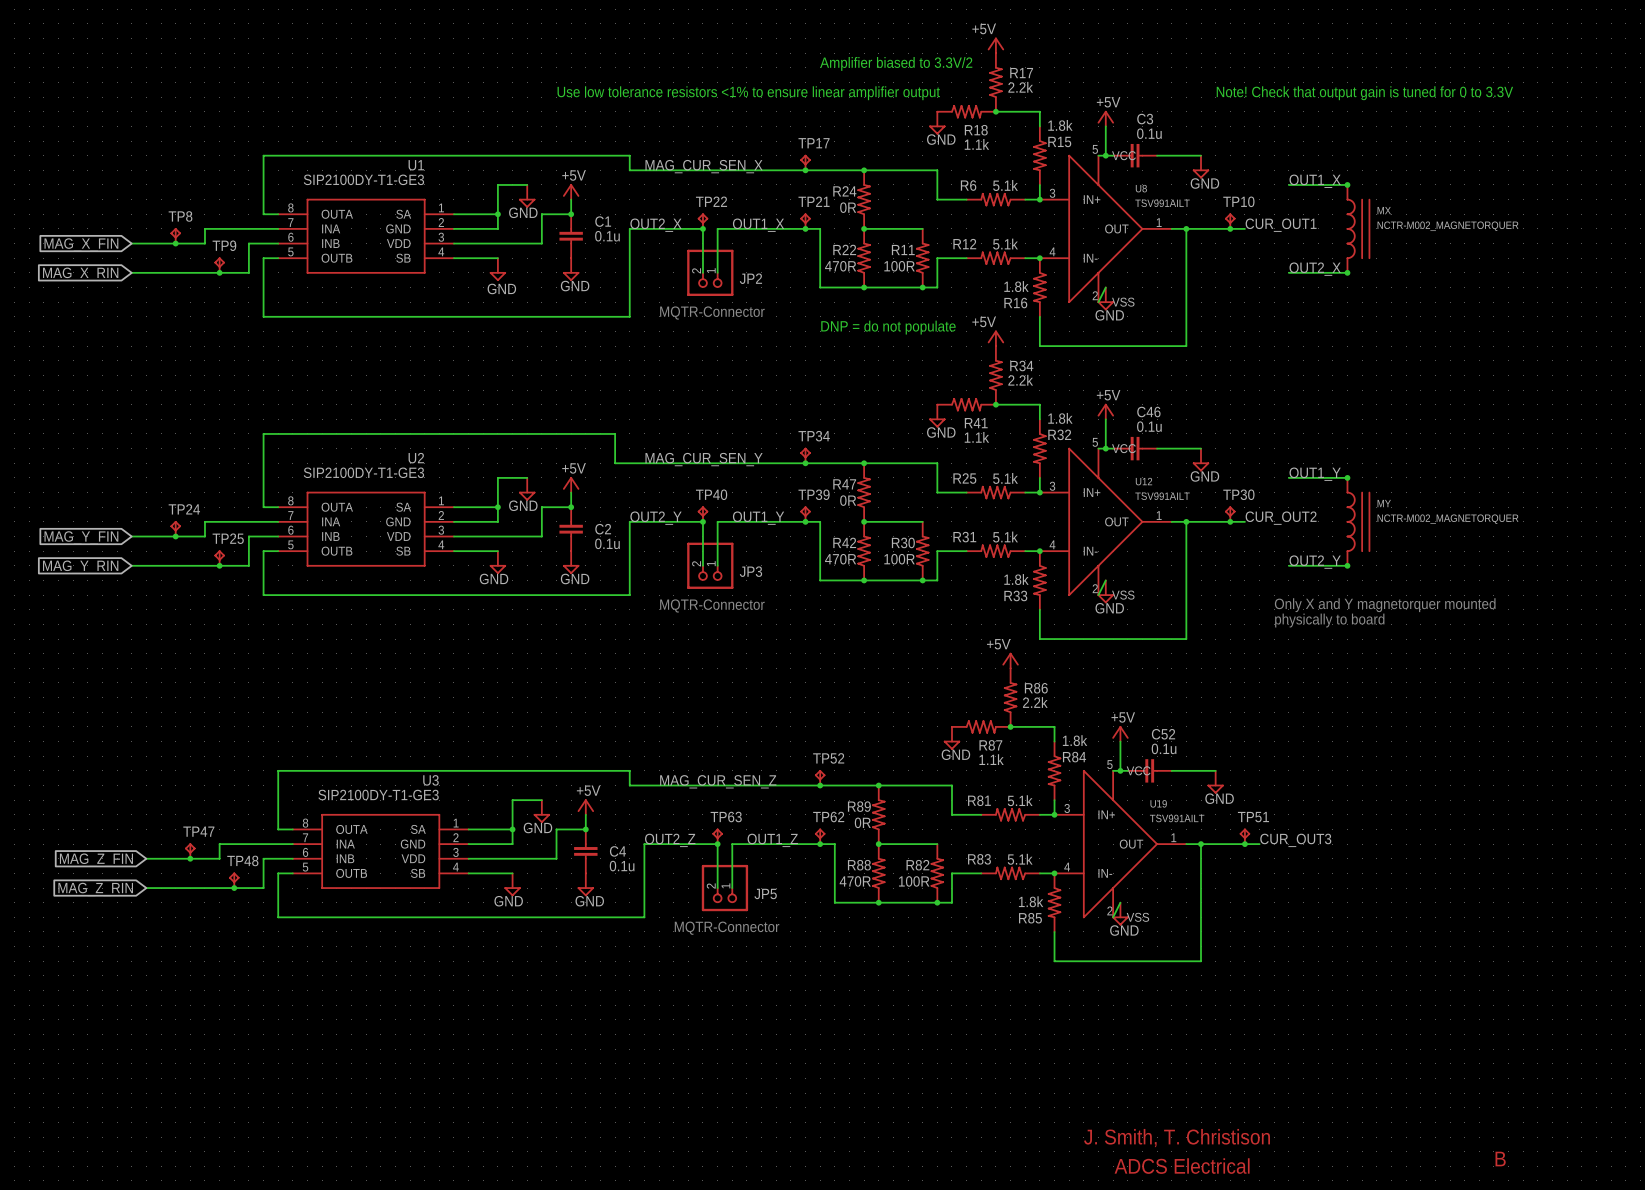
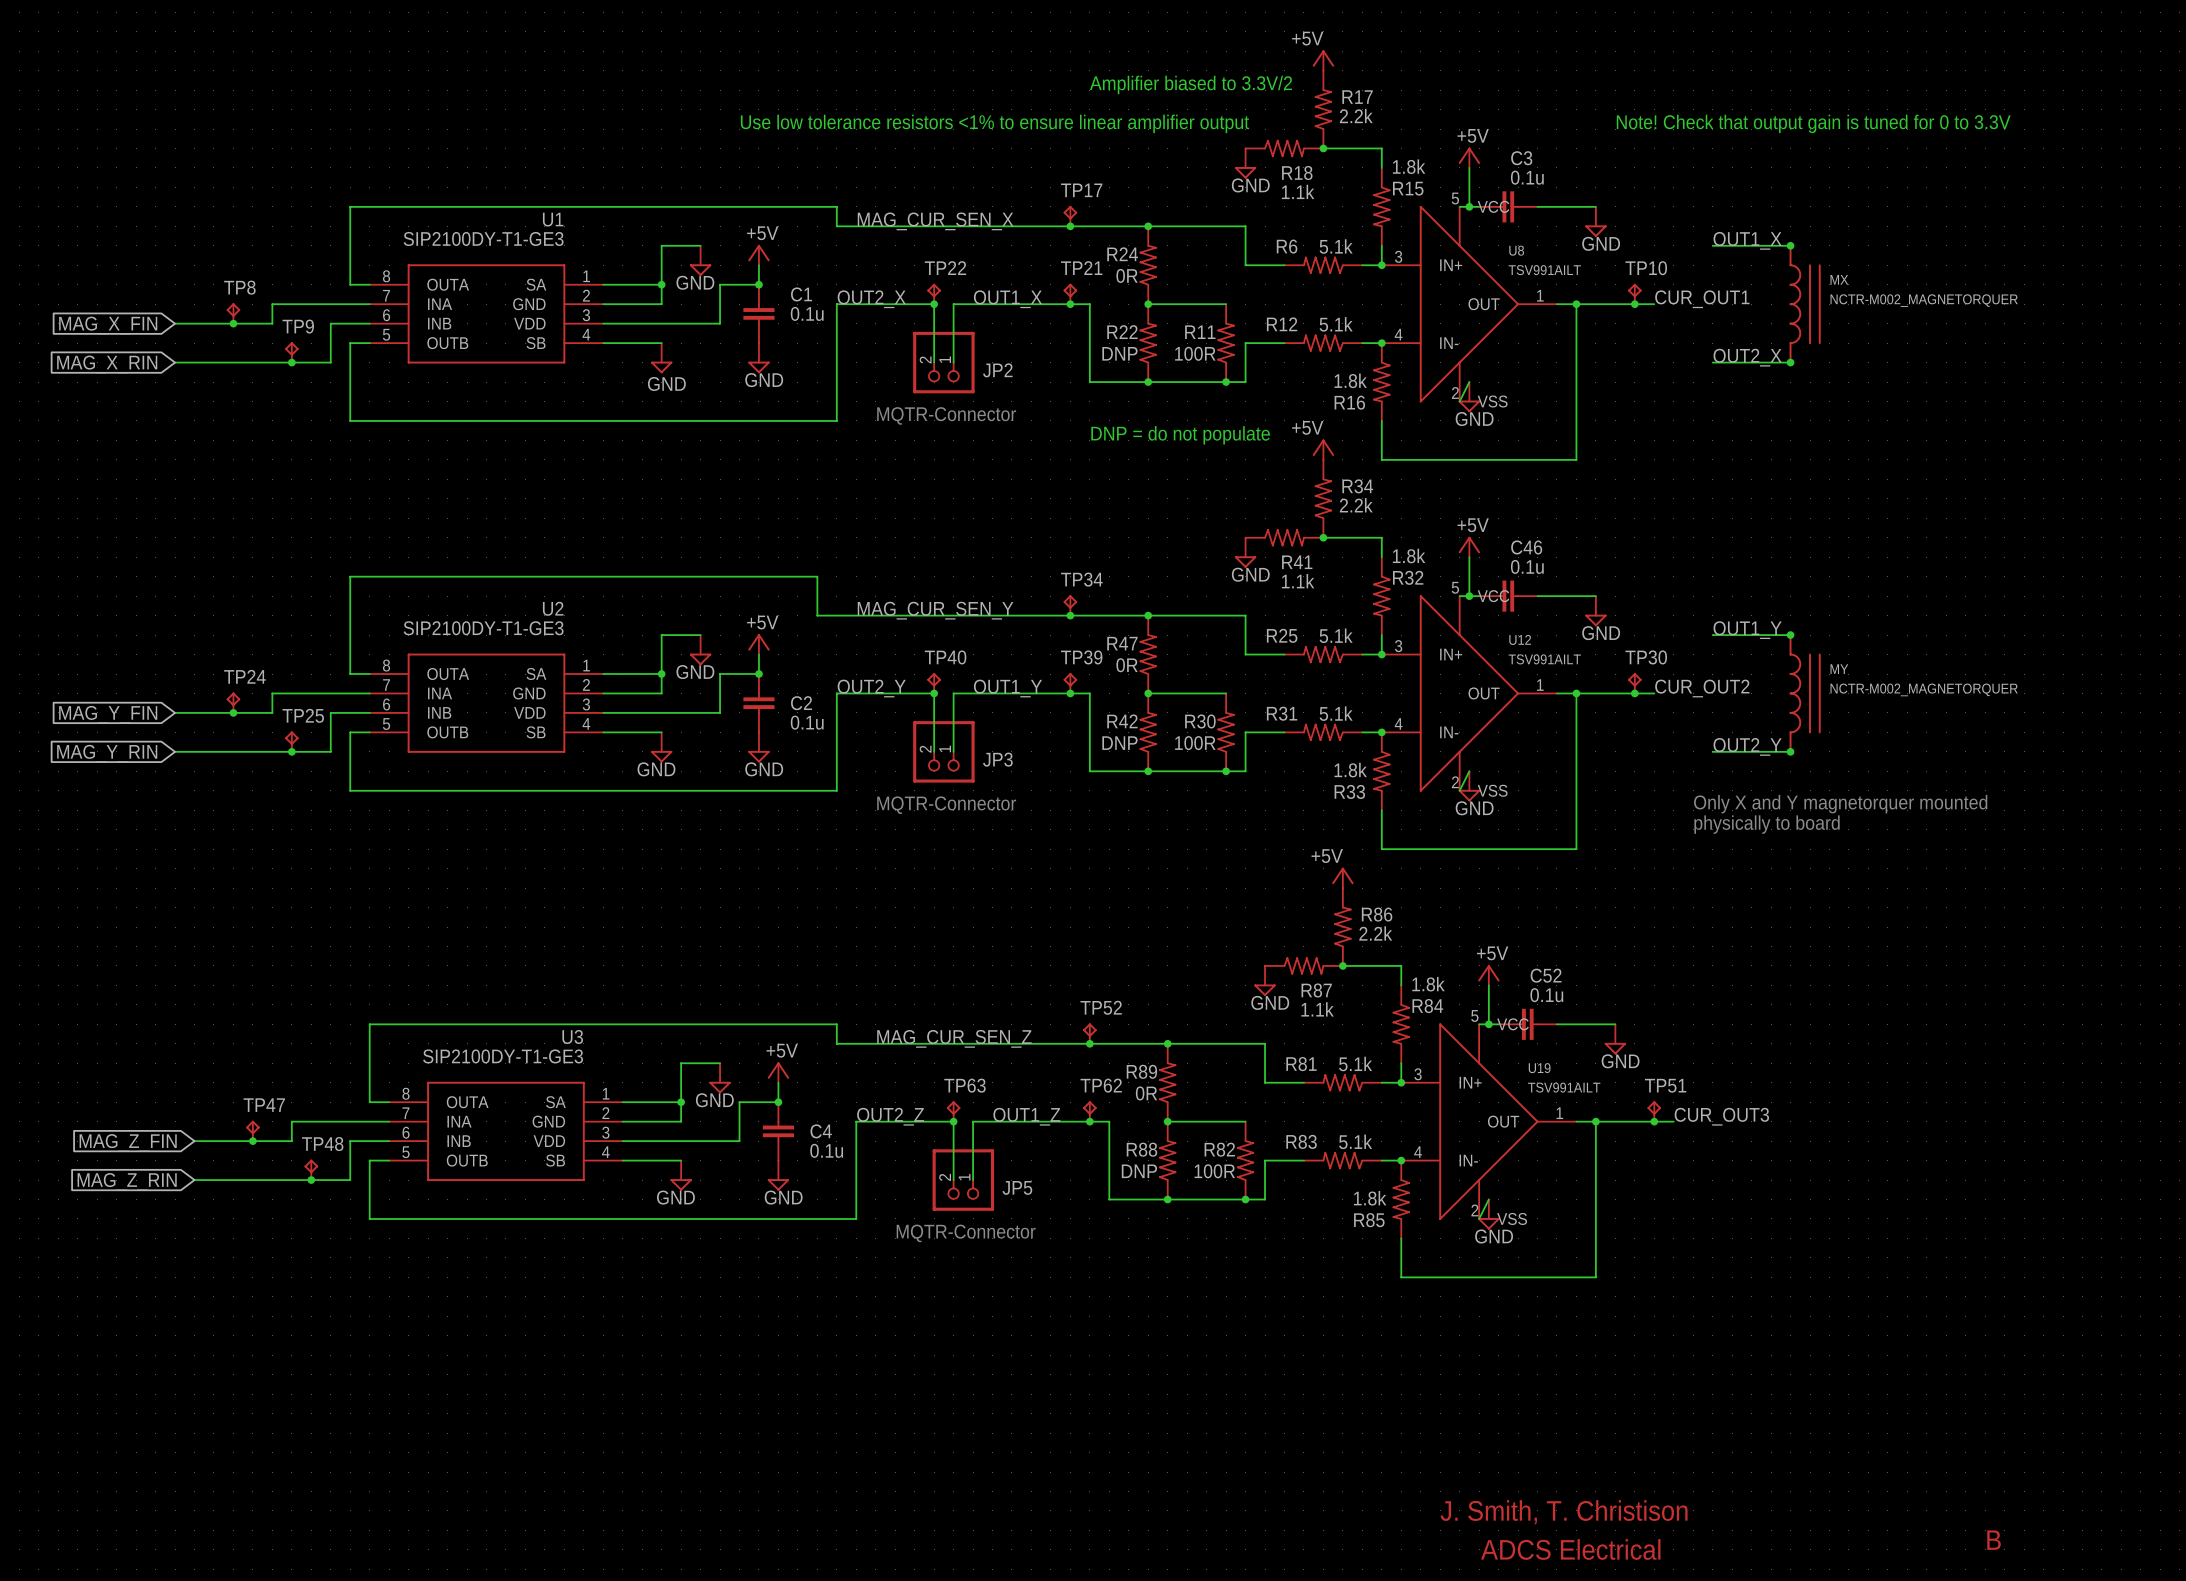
R22 value: 470R (840, 266) -> DNP (1119, 353)
R42 value: 470R (840, 559) -> DNP (1119, 743)
R88 value: 470R (855, 881) -> DNP (1139, 1171)

